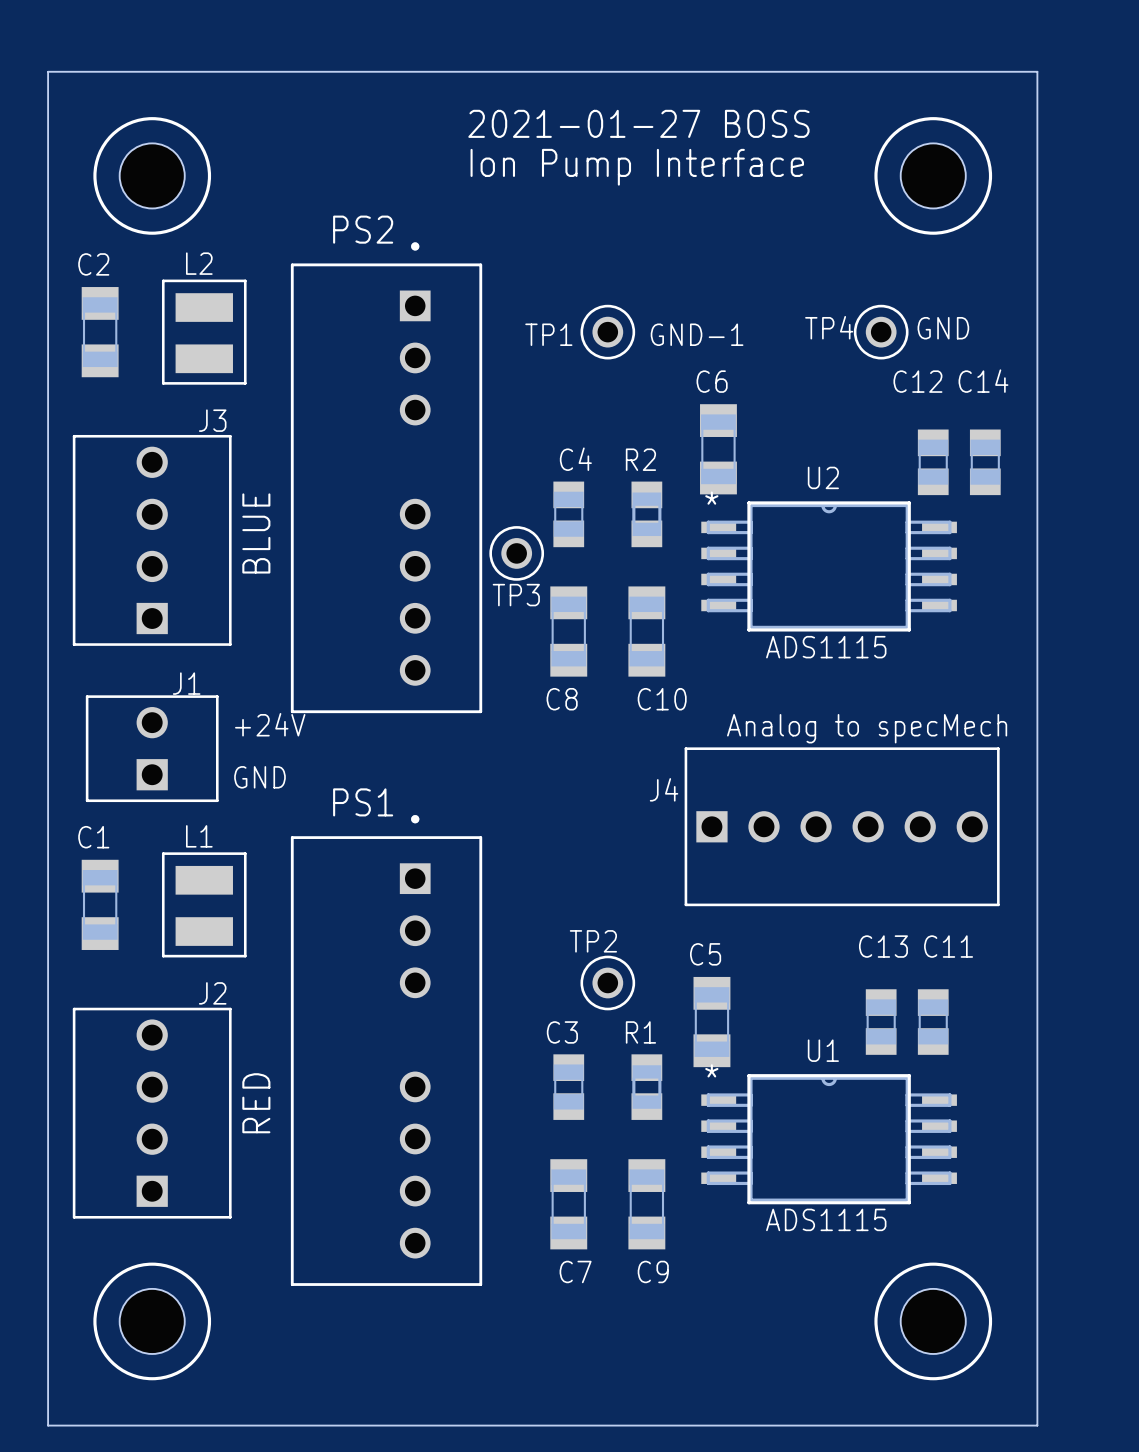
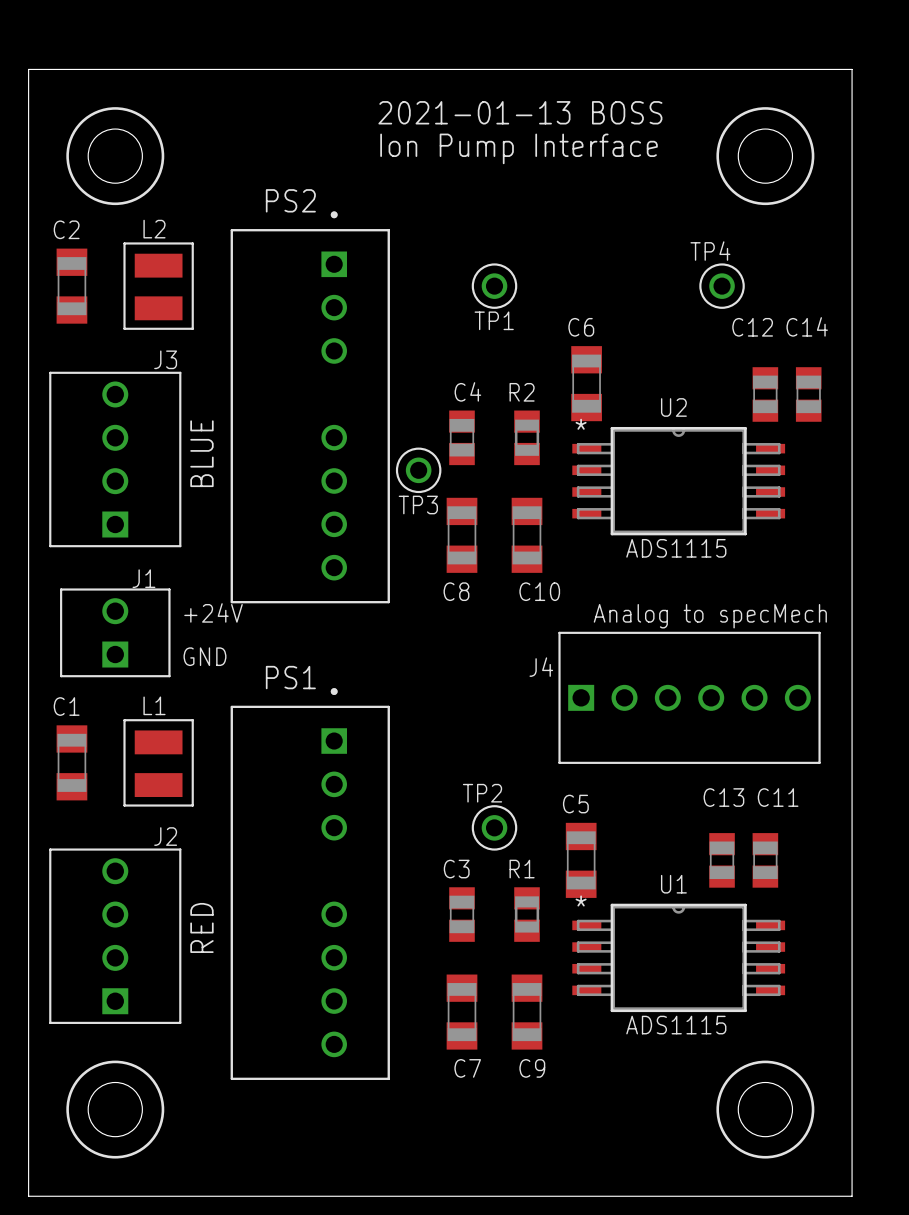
text: 2021-01-27 BOSS (638, 123) -> 2021-01-13 BOSS (520, 112)
TP4 name position: TP4 (829, 327) -> TP4 (710, 251)
text: GND (943, 328) -> none
TP1 name position: TP1 (548, 334) -> TP1 (494, 320)
text: GND-1 (697, 334) -> none

